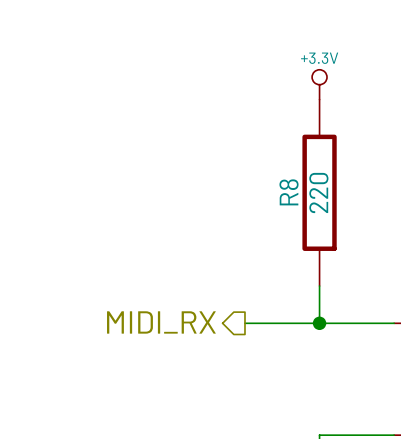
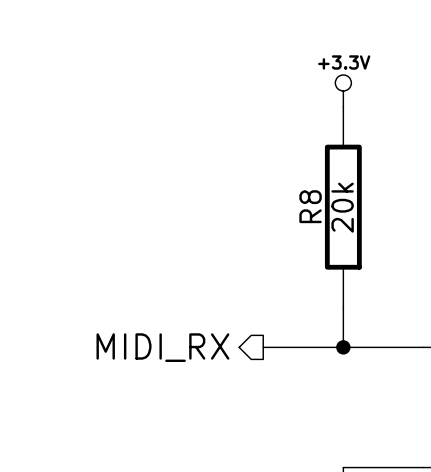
R8 value: 220 (318, 192) -> 20k (342, 207)

